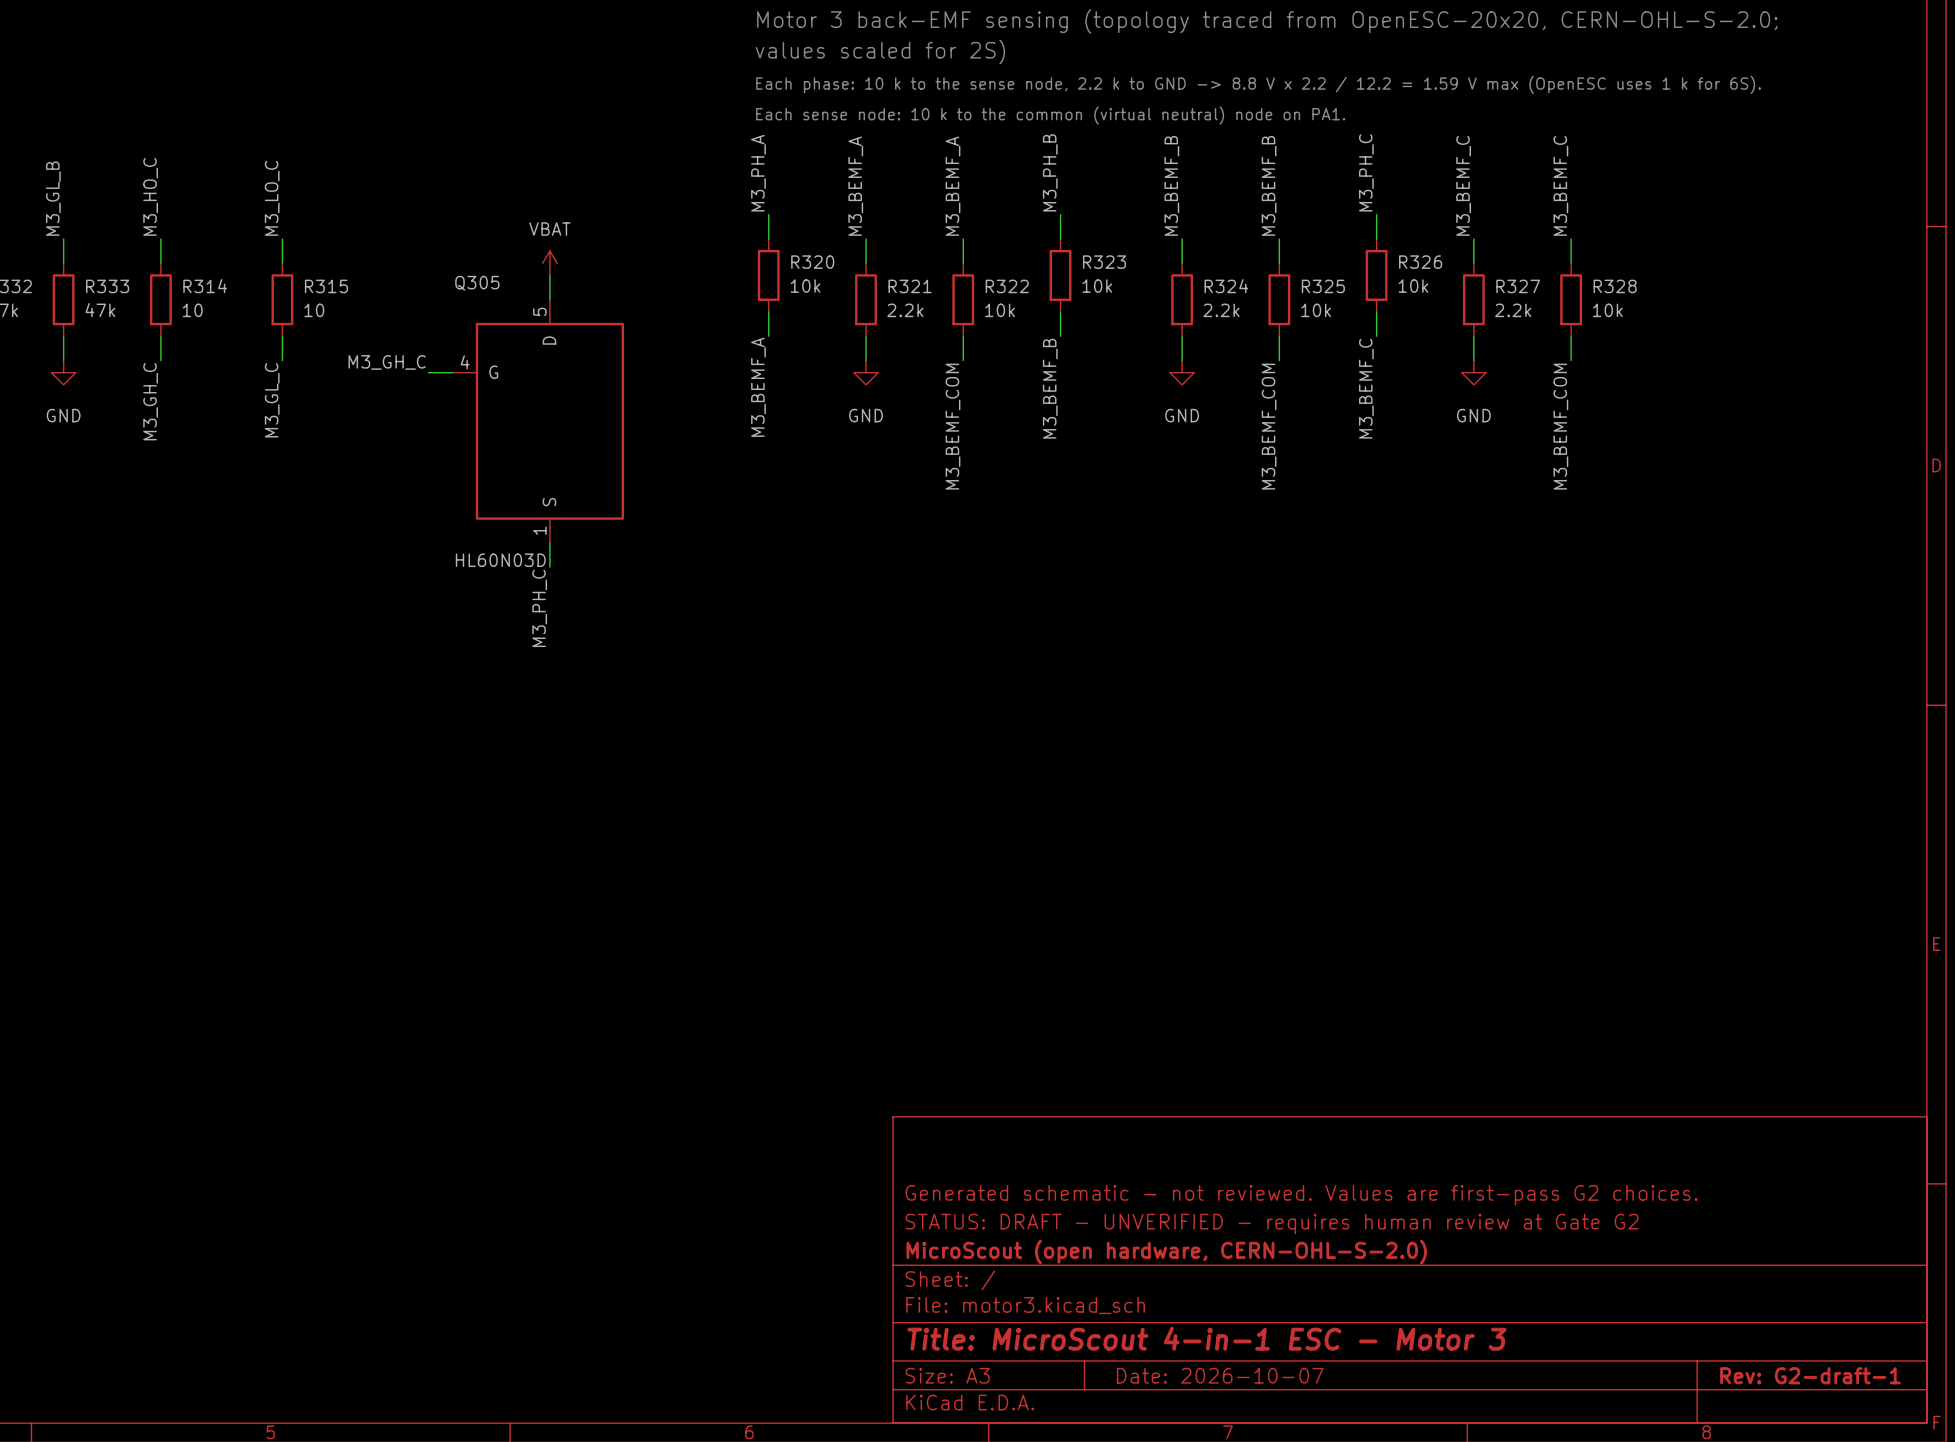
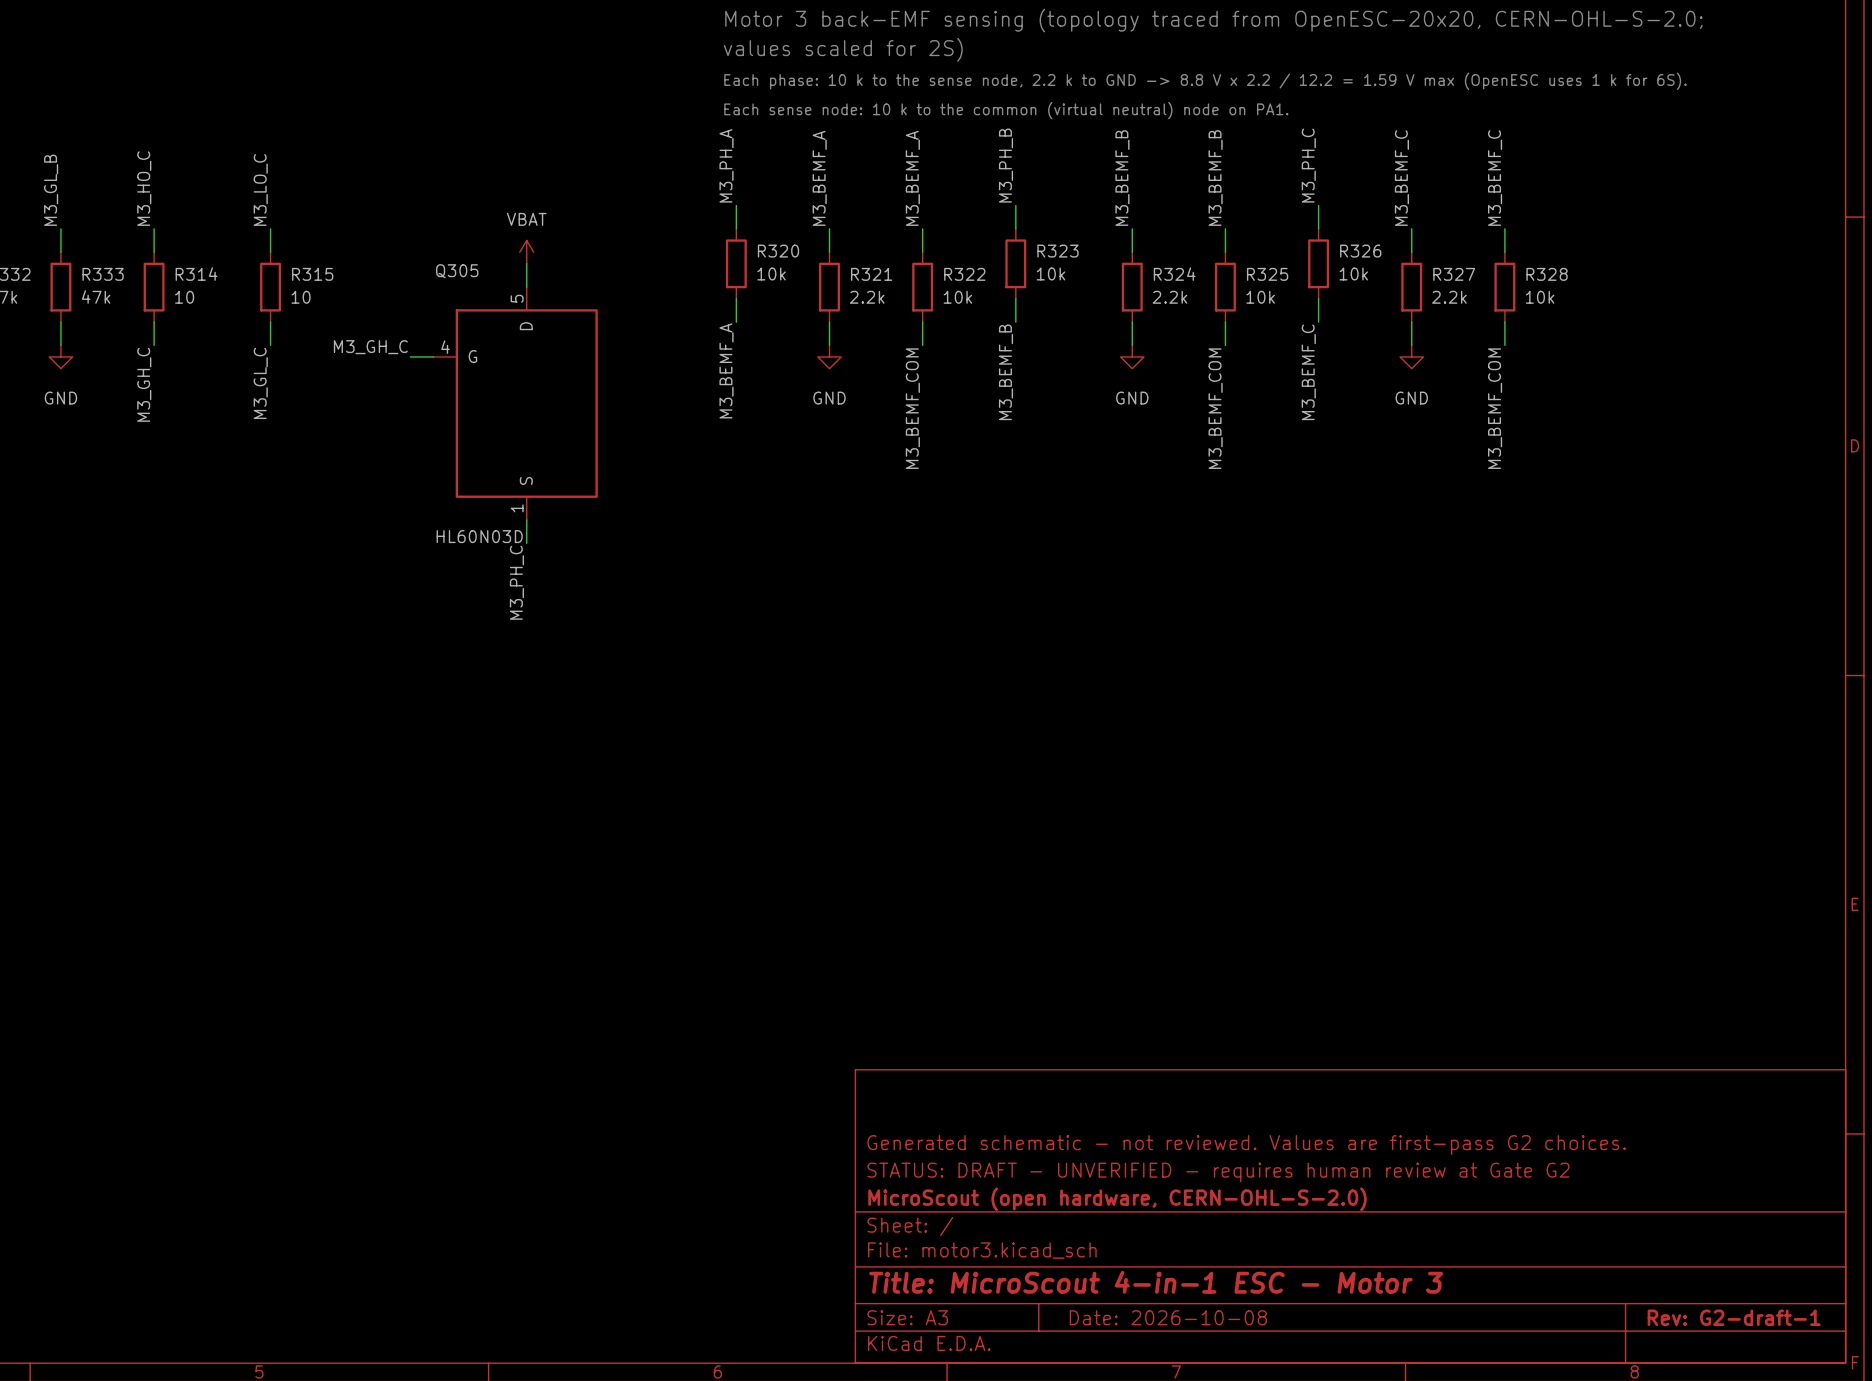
title block: Date: 2026-10-07 (1220, 1375) -> Date: 2026-10-08 (1168, 1317)

